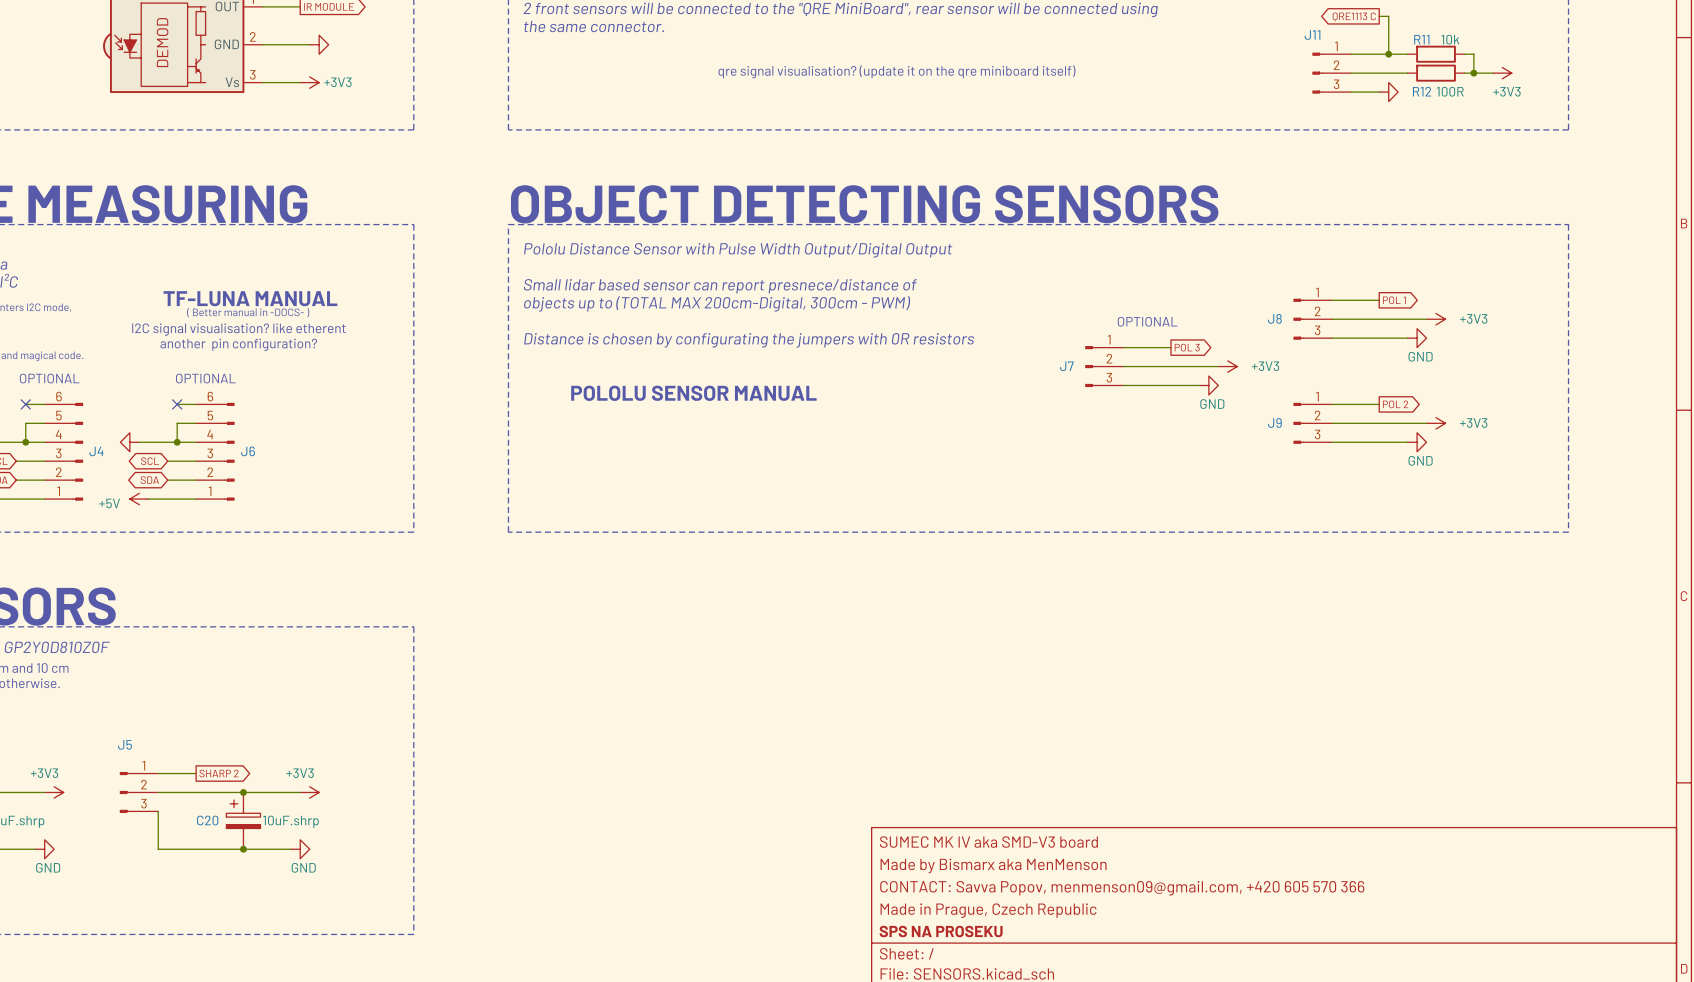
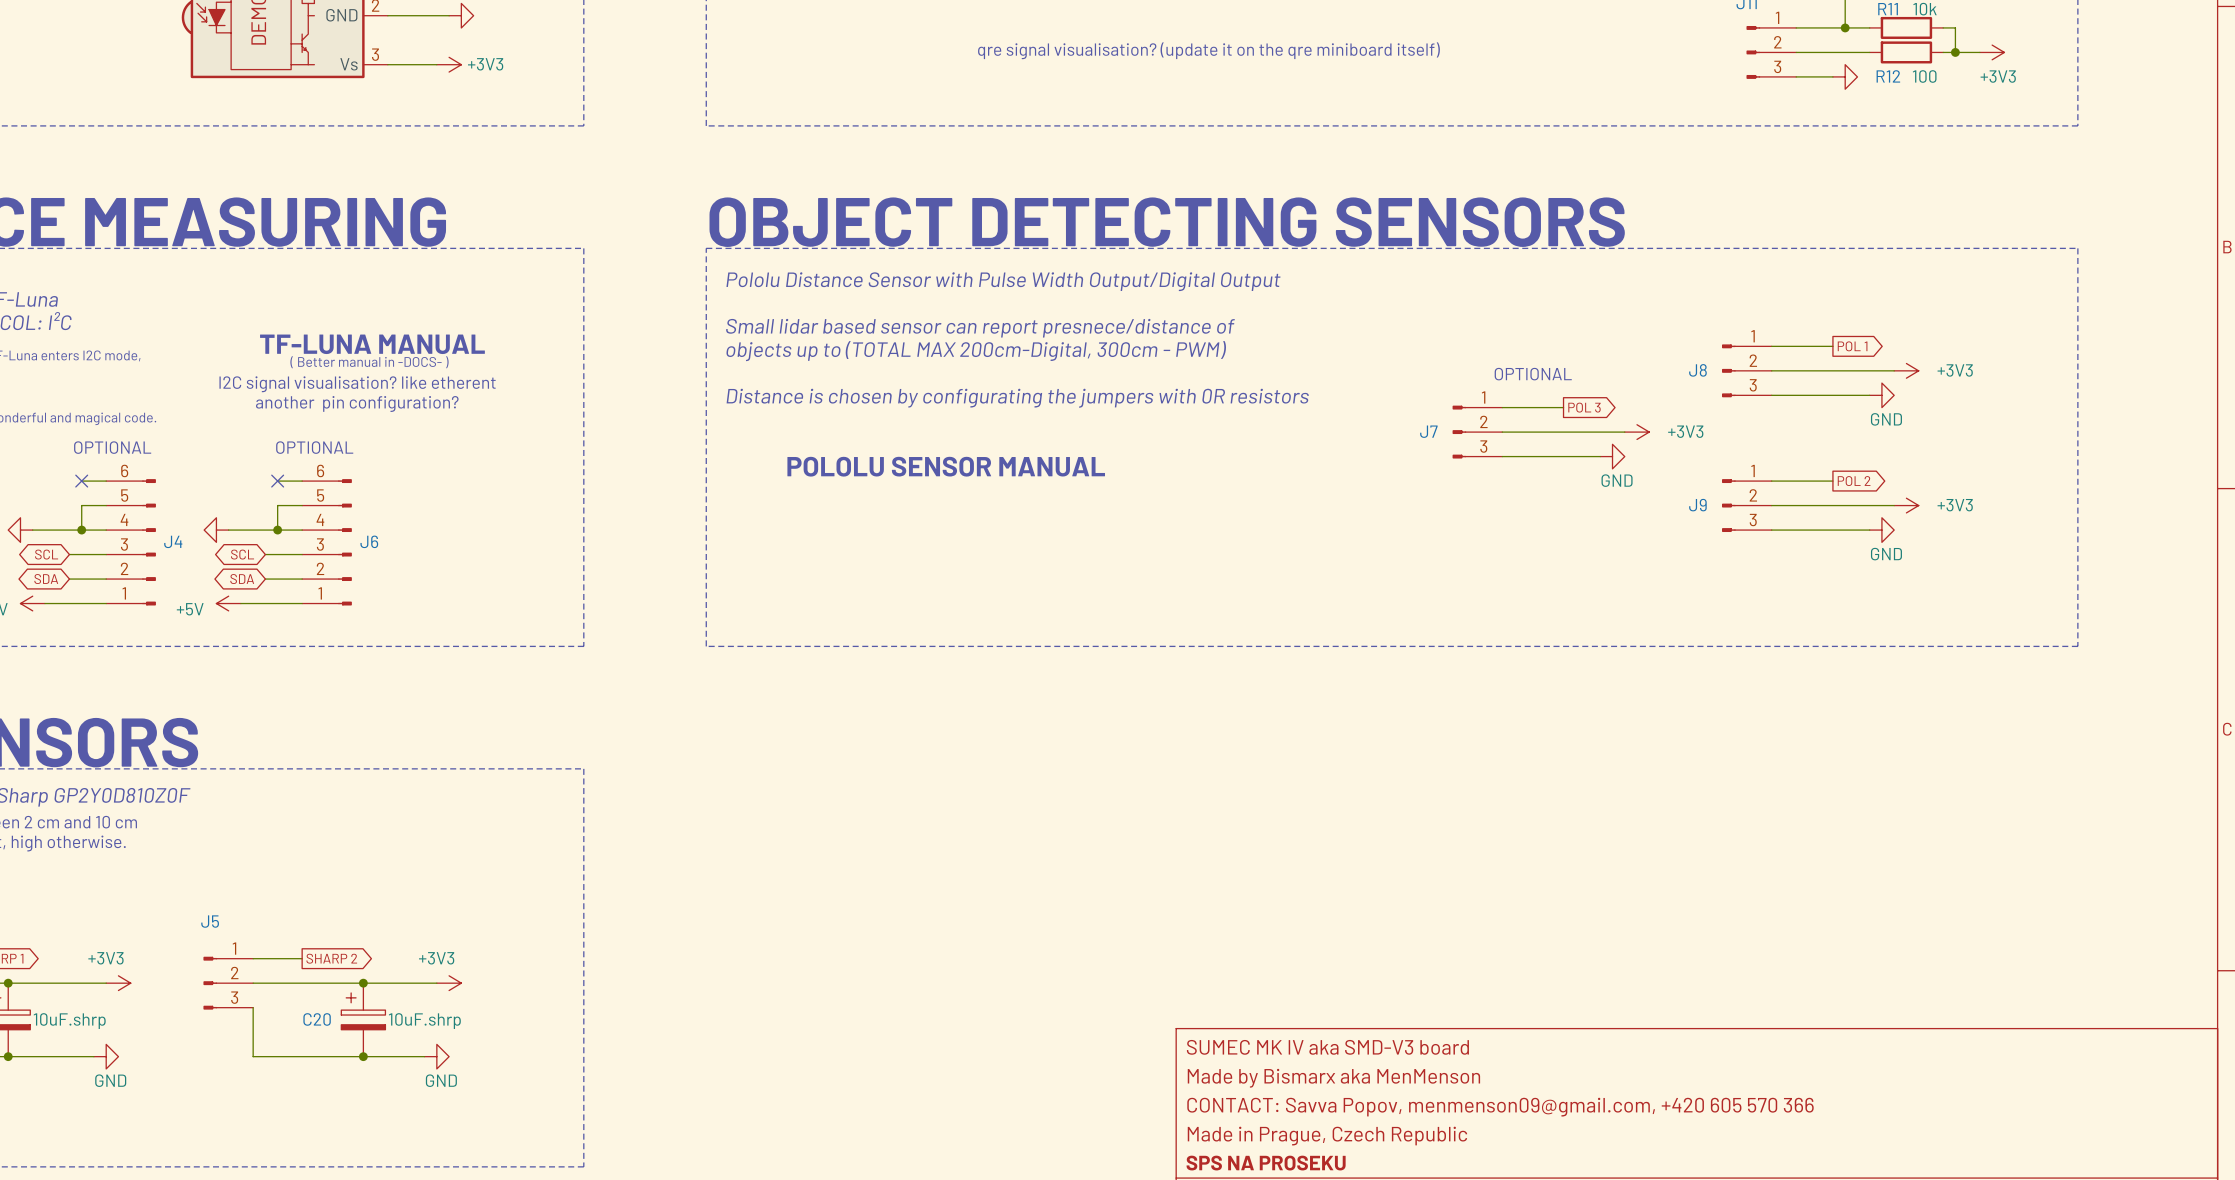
R12 value: 100R (1450, 91) -> 100 (1924, 76)

